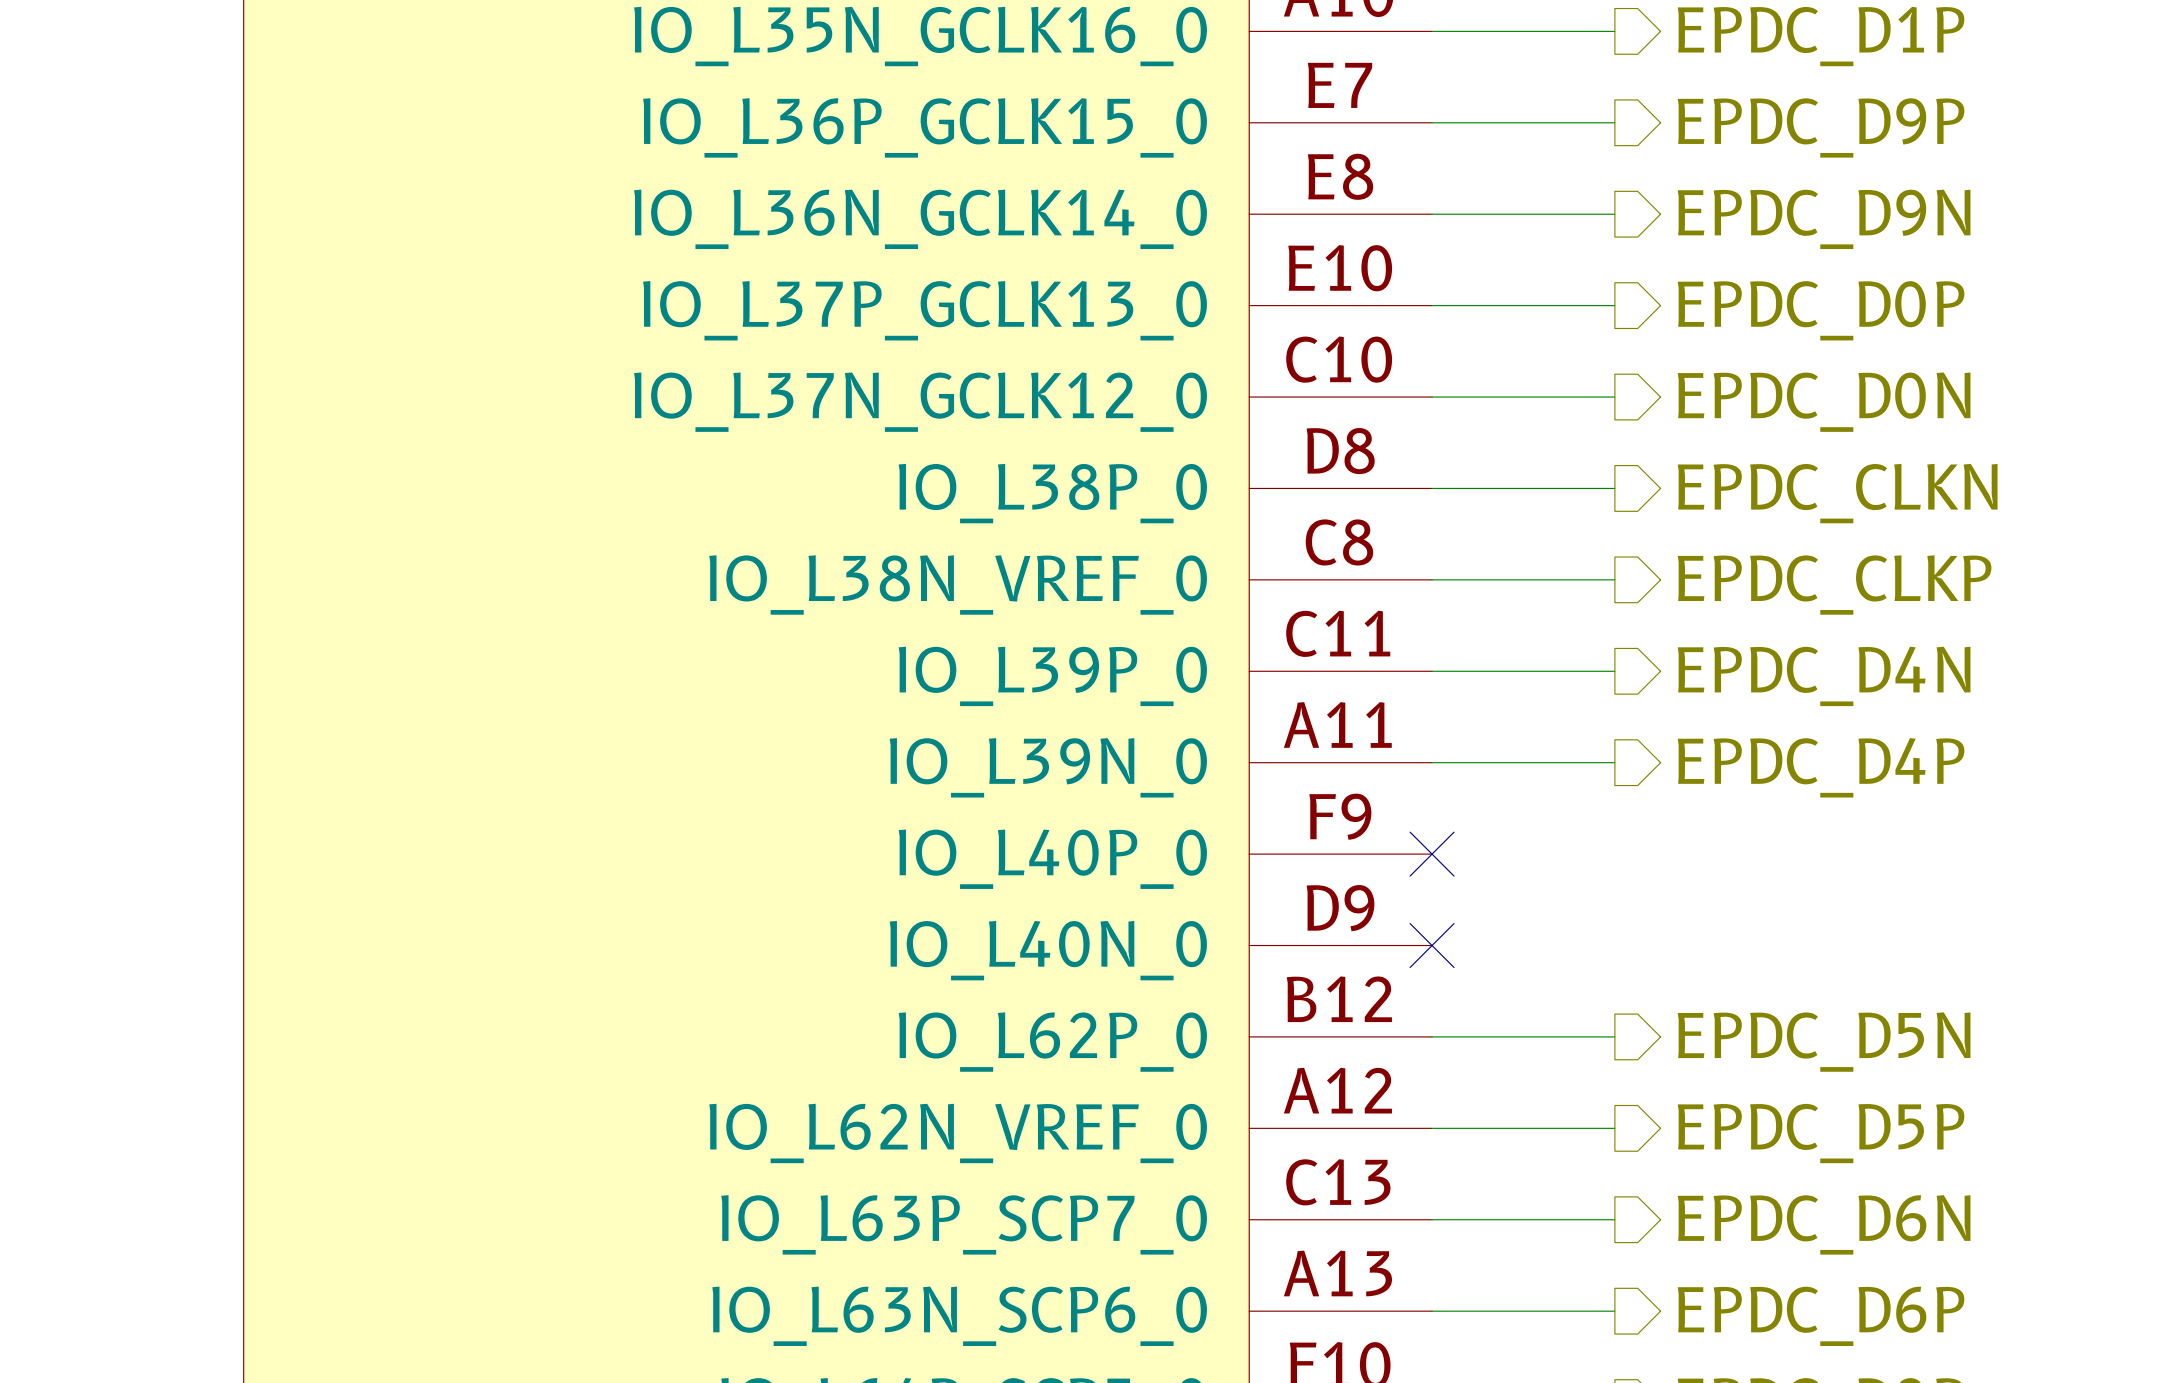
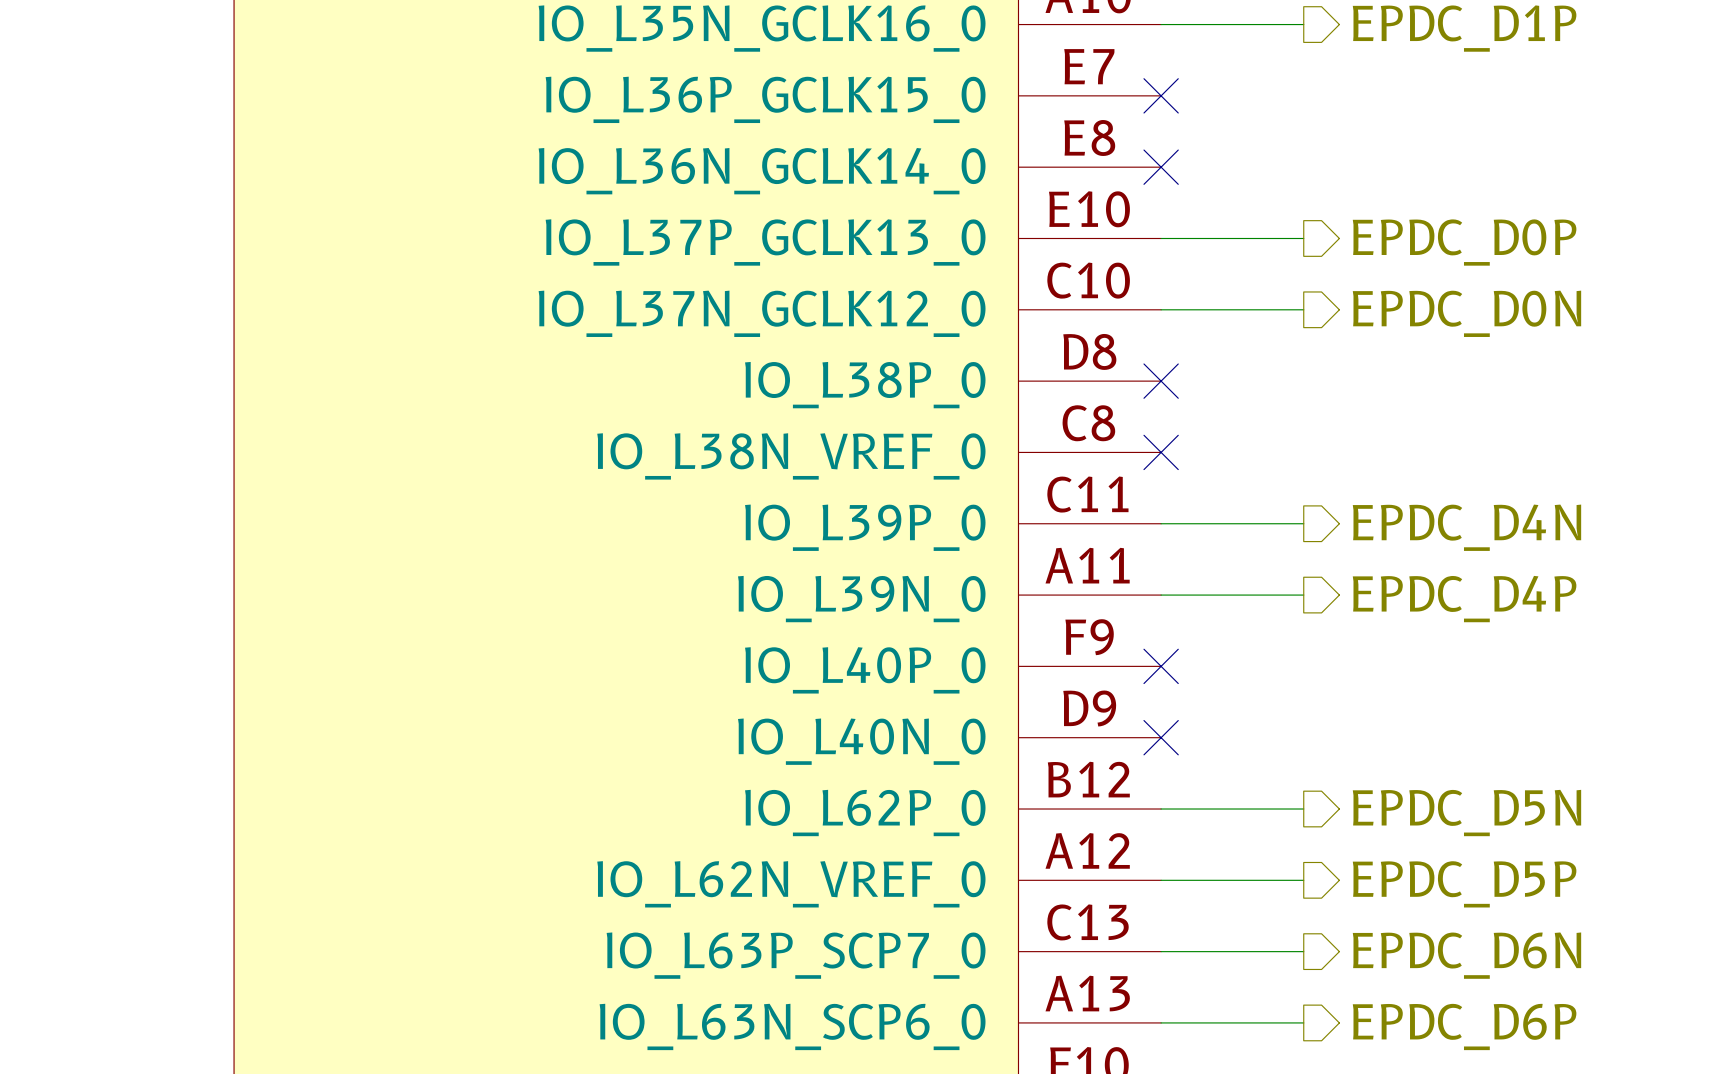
wire: (1432, 122) (1614, 122) -> none
no-connect mark: none -> (1161, 95)
hierarchical label: EPDC_D9P (1821, 127) -> none
wire: (1432, 214) (1614, 214) -> none
no-connect mark: none -> (1161, 167)
hierarchical label: EPDC_D9N (1824, 219) -> none
wire: (1432, 488) (1614, 488) -> none
no-connect mark: none -> (1161, 381)
hierarchical label: EPDC_CLKN (1837, 493) -> none
wire: (1432, 579) (1614, 579) -> none
no-connect mark: none -> (1161, 452)
hierarchical label: EPDC_CLKP (1834, 585) -> none

